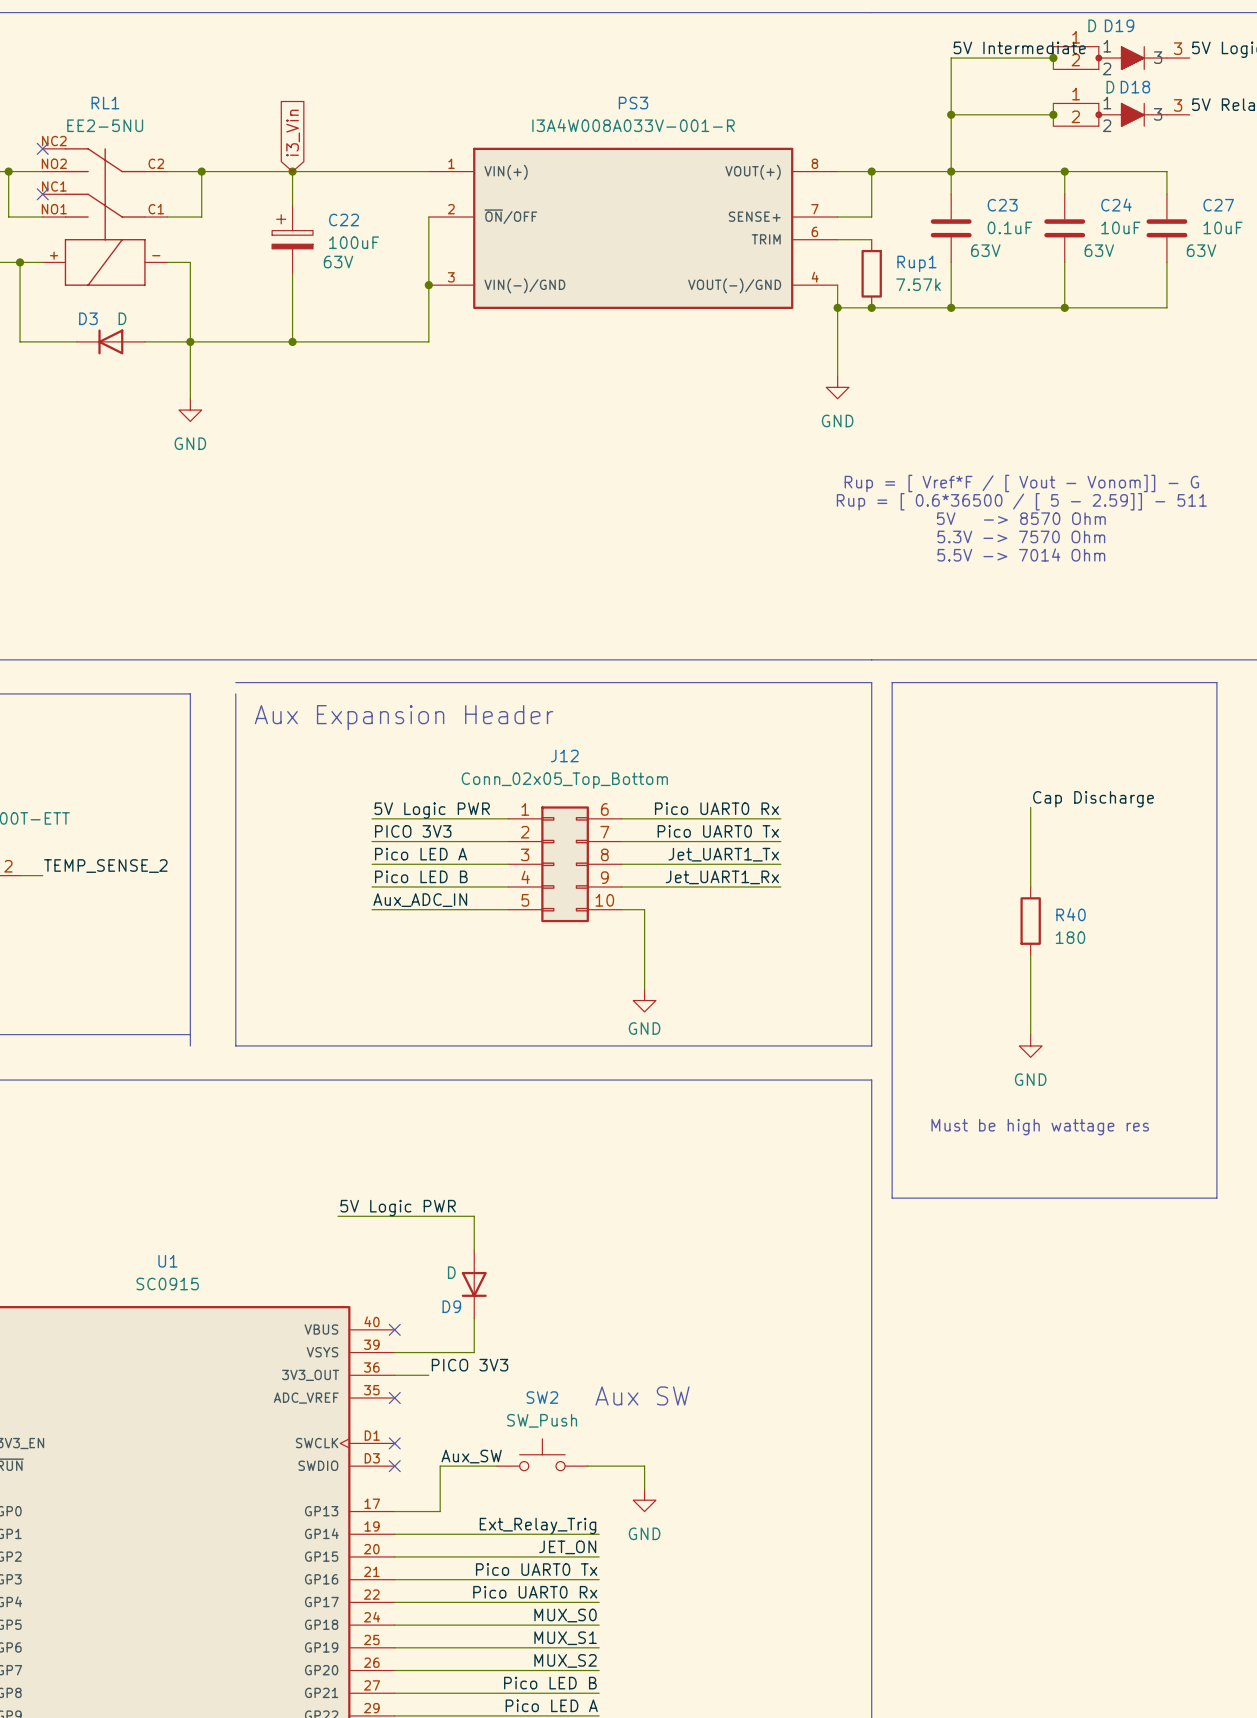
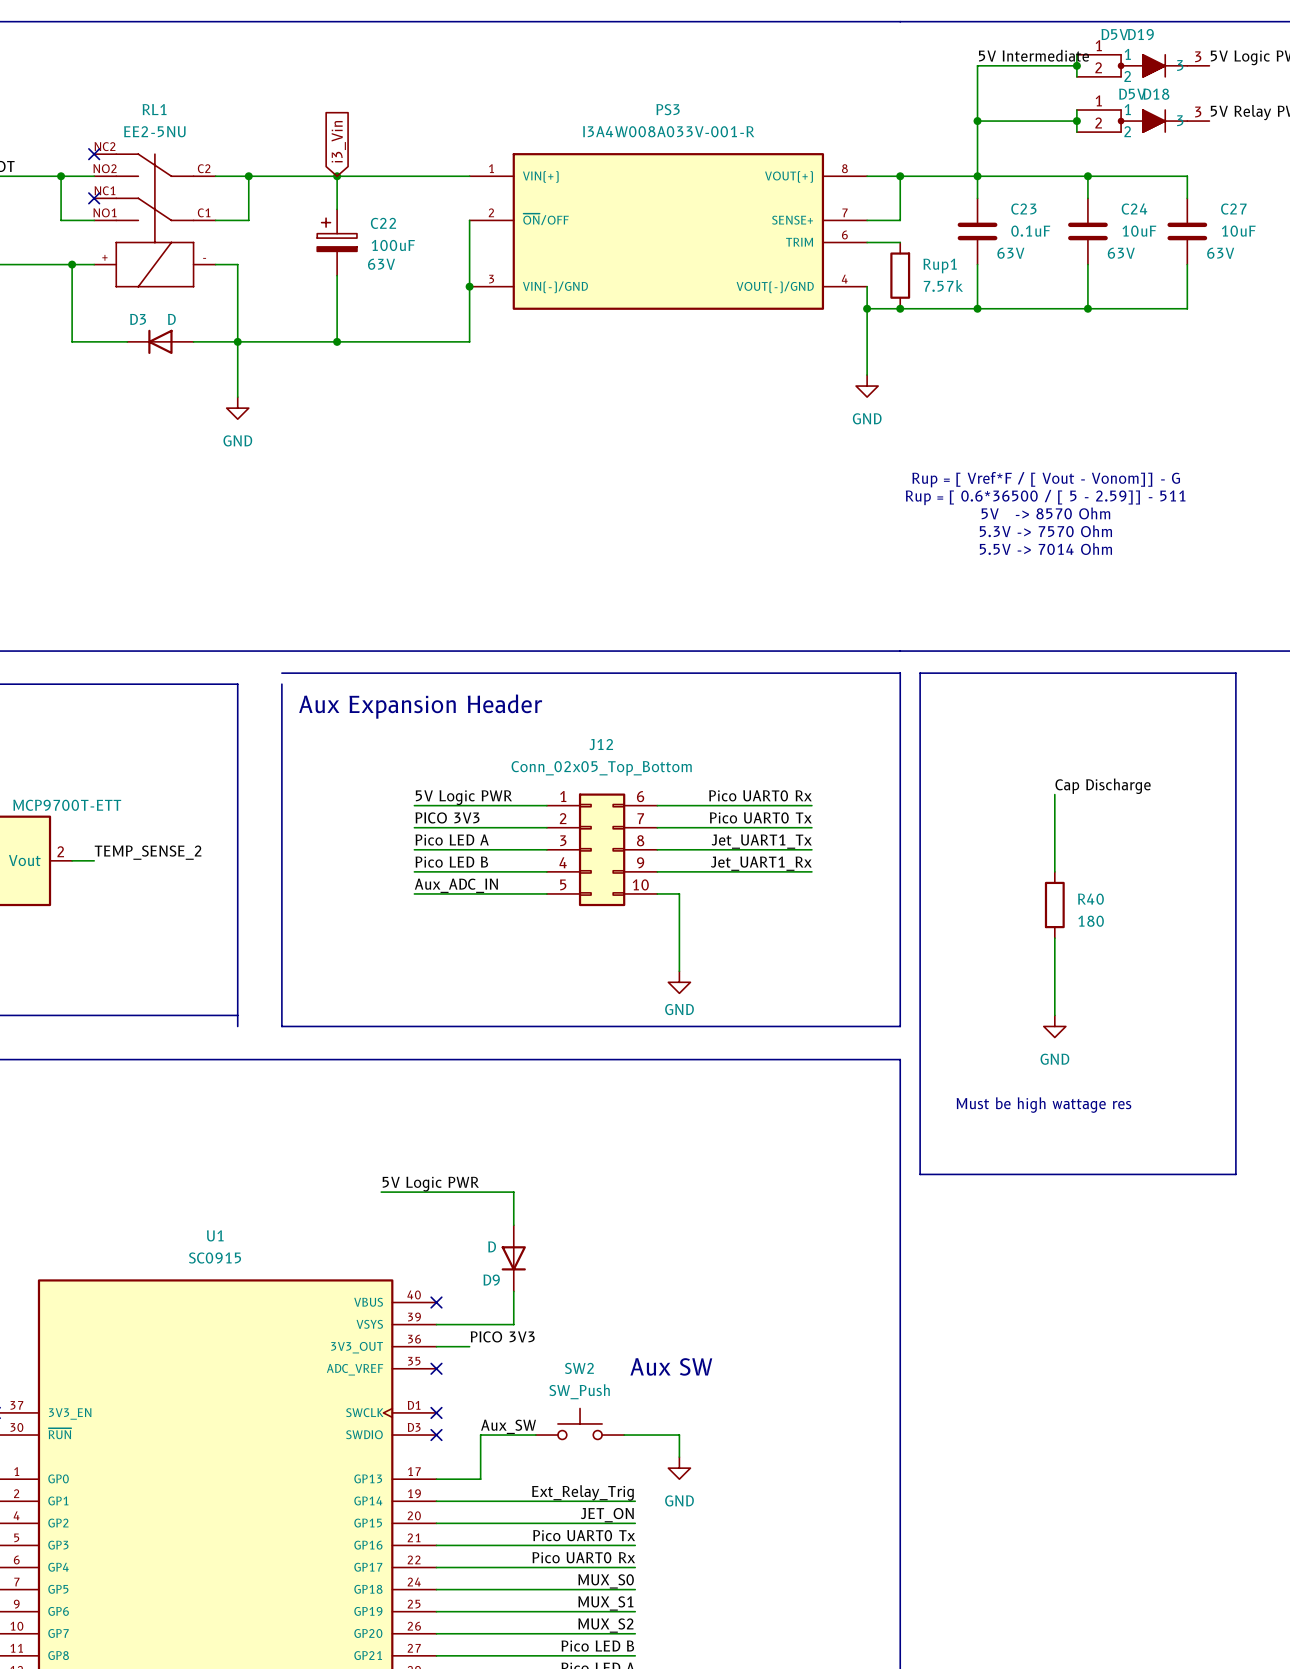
D19 value: D (1092, 25) -> D5V (1114, 34)
D18 value: D (1110, 87) -> D5V (1132, 94)

